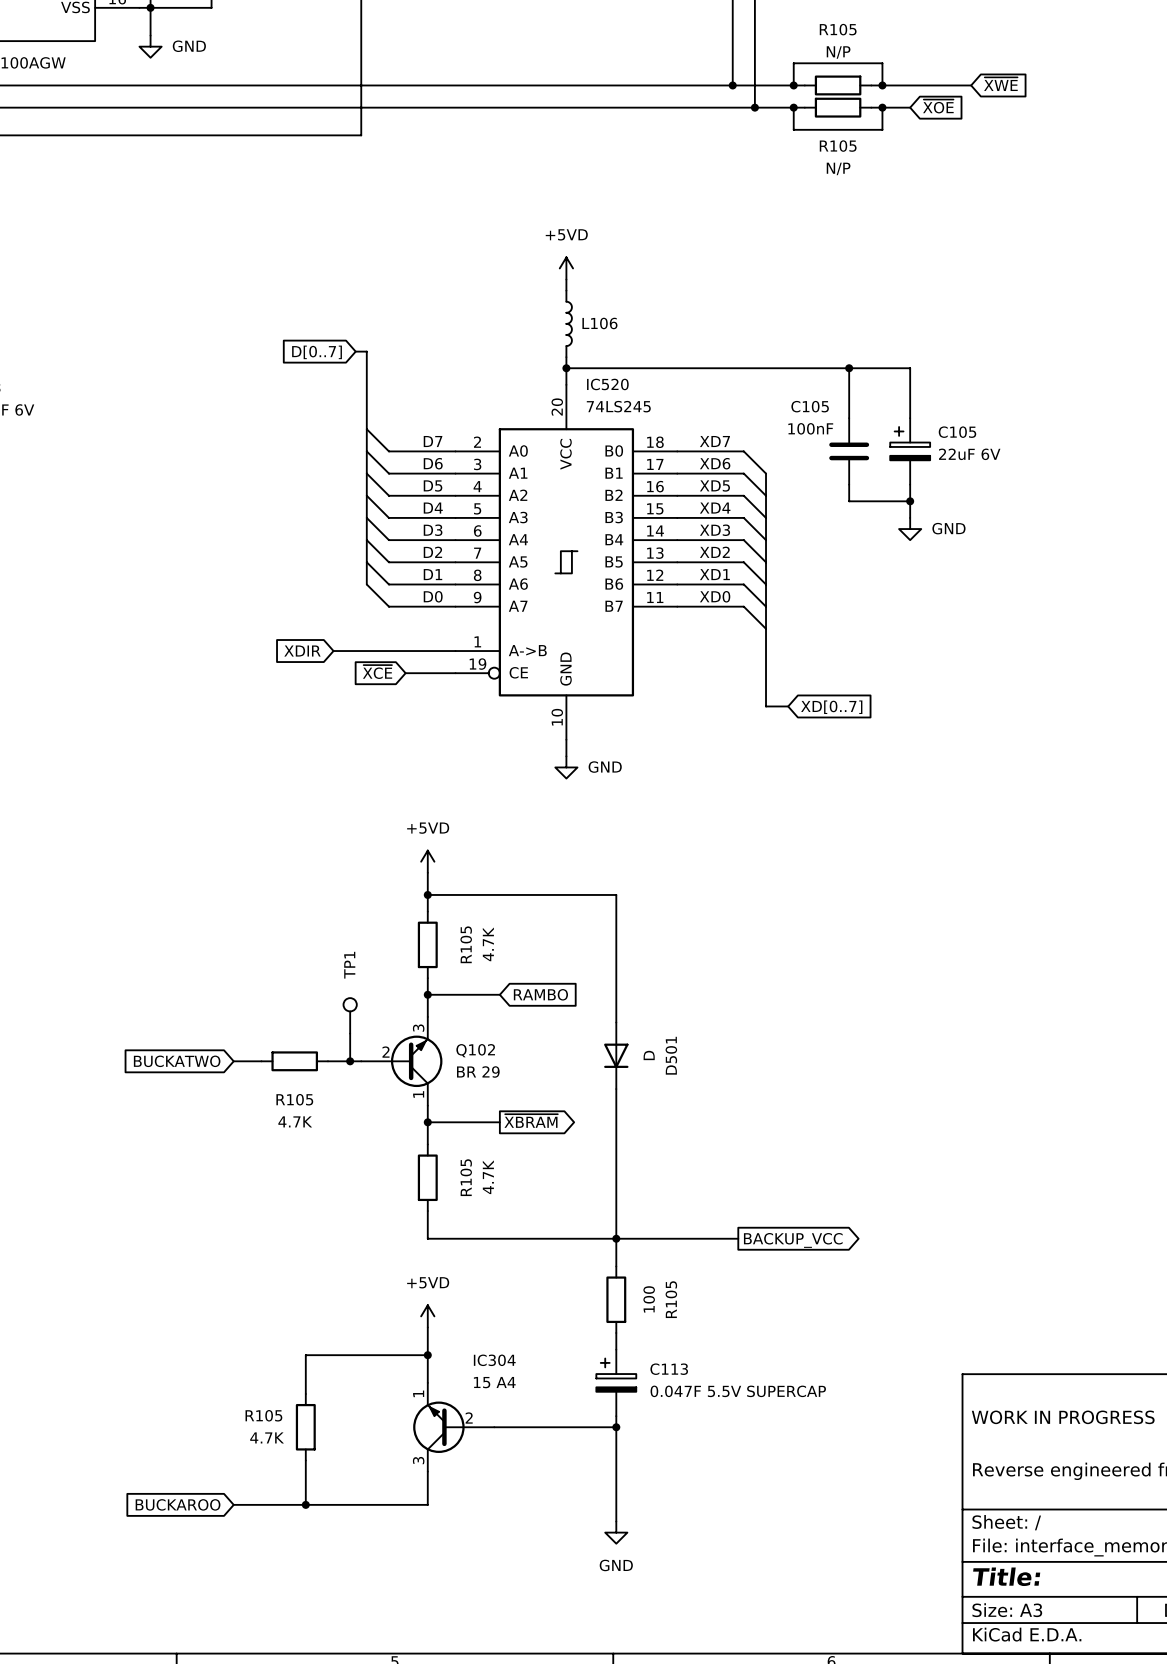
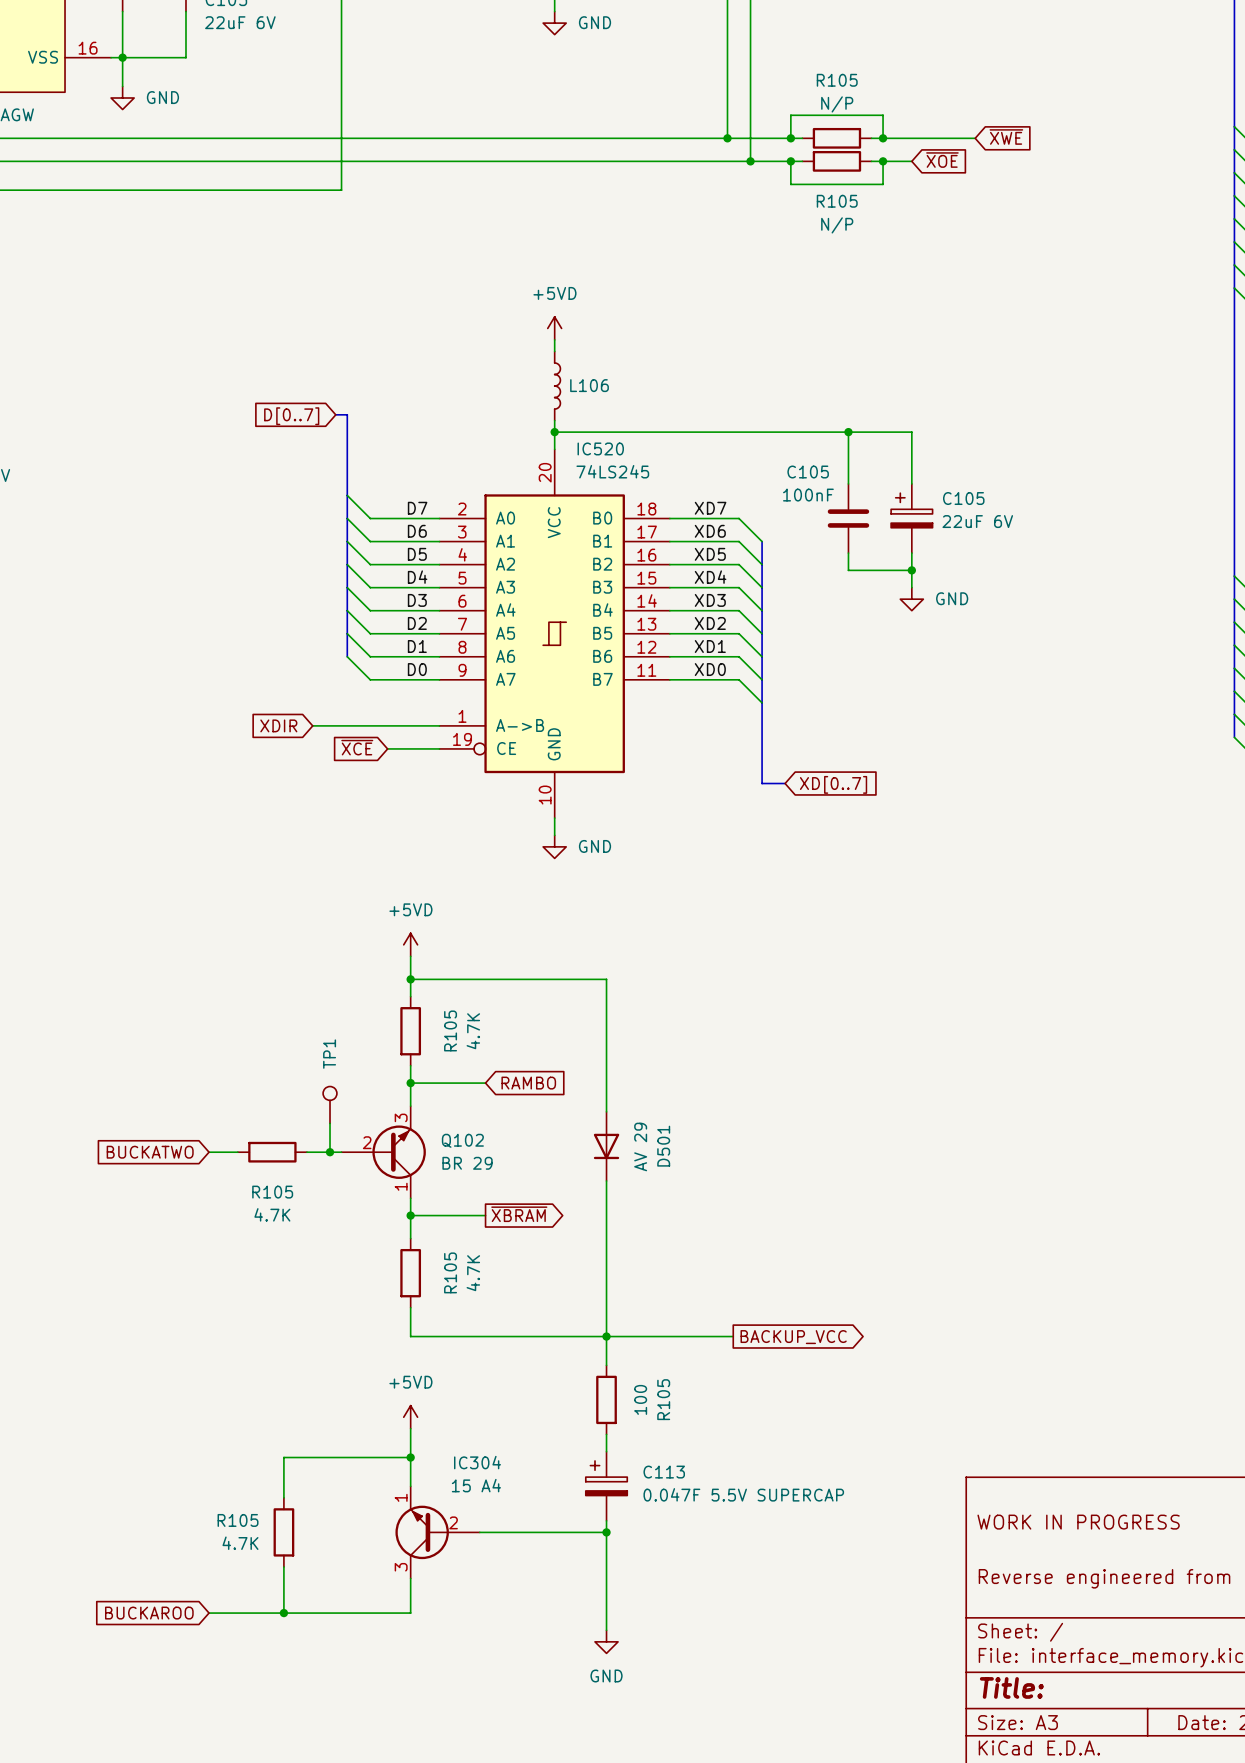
D501 value: D (649, 1055) -> AV 29 (640, 1146)

